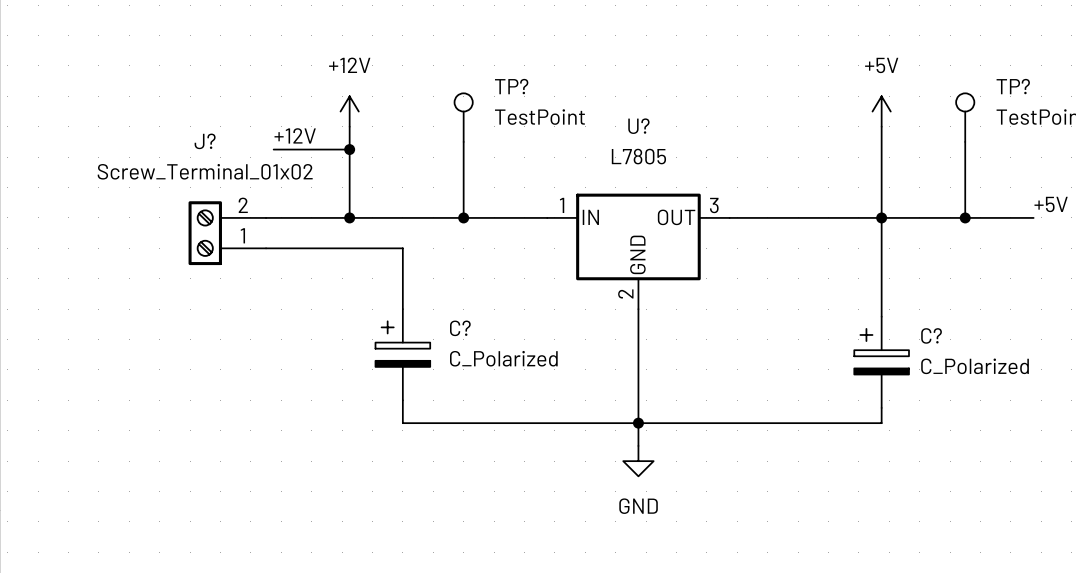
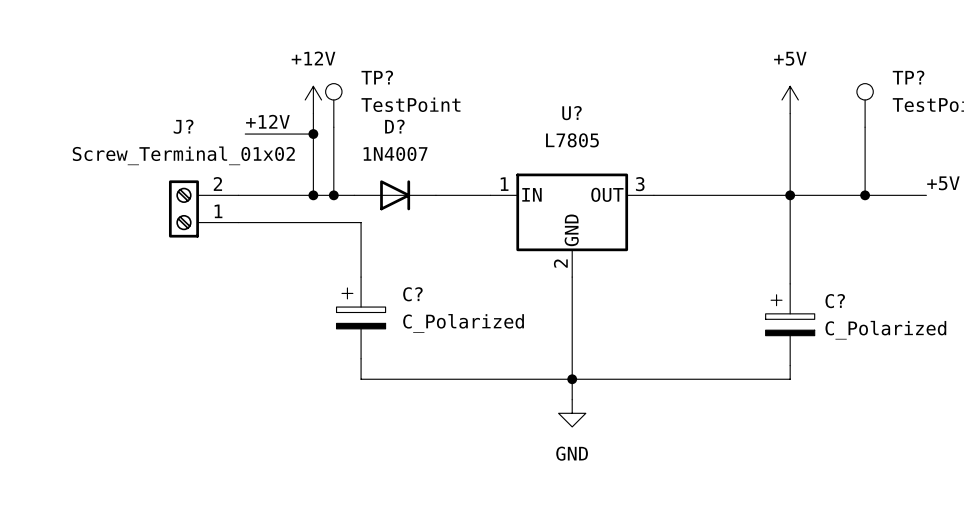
TP? position: (463, 117) -> (333, 105)
wire: (463, 141) (463, 217) -> (333, 127) (333, 195)
junction: none -> (333, 195)
D?: none -> 1N4007 (395, 195)
junction: (463, 217) -> none

